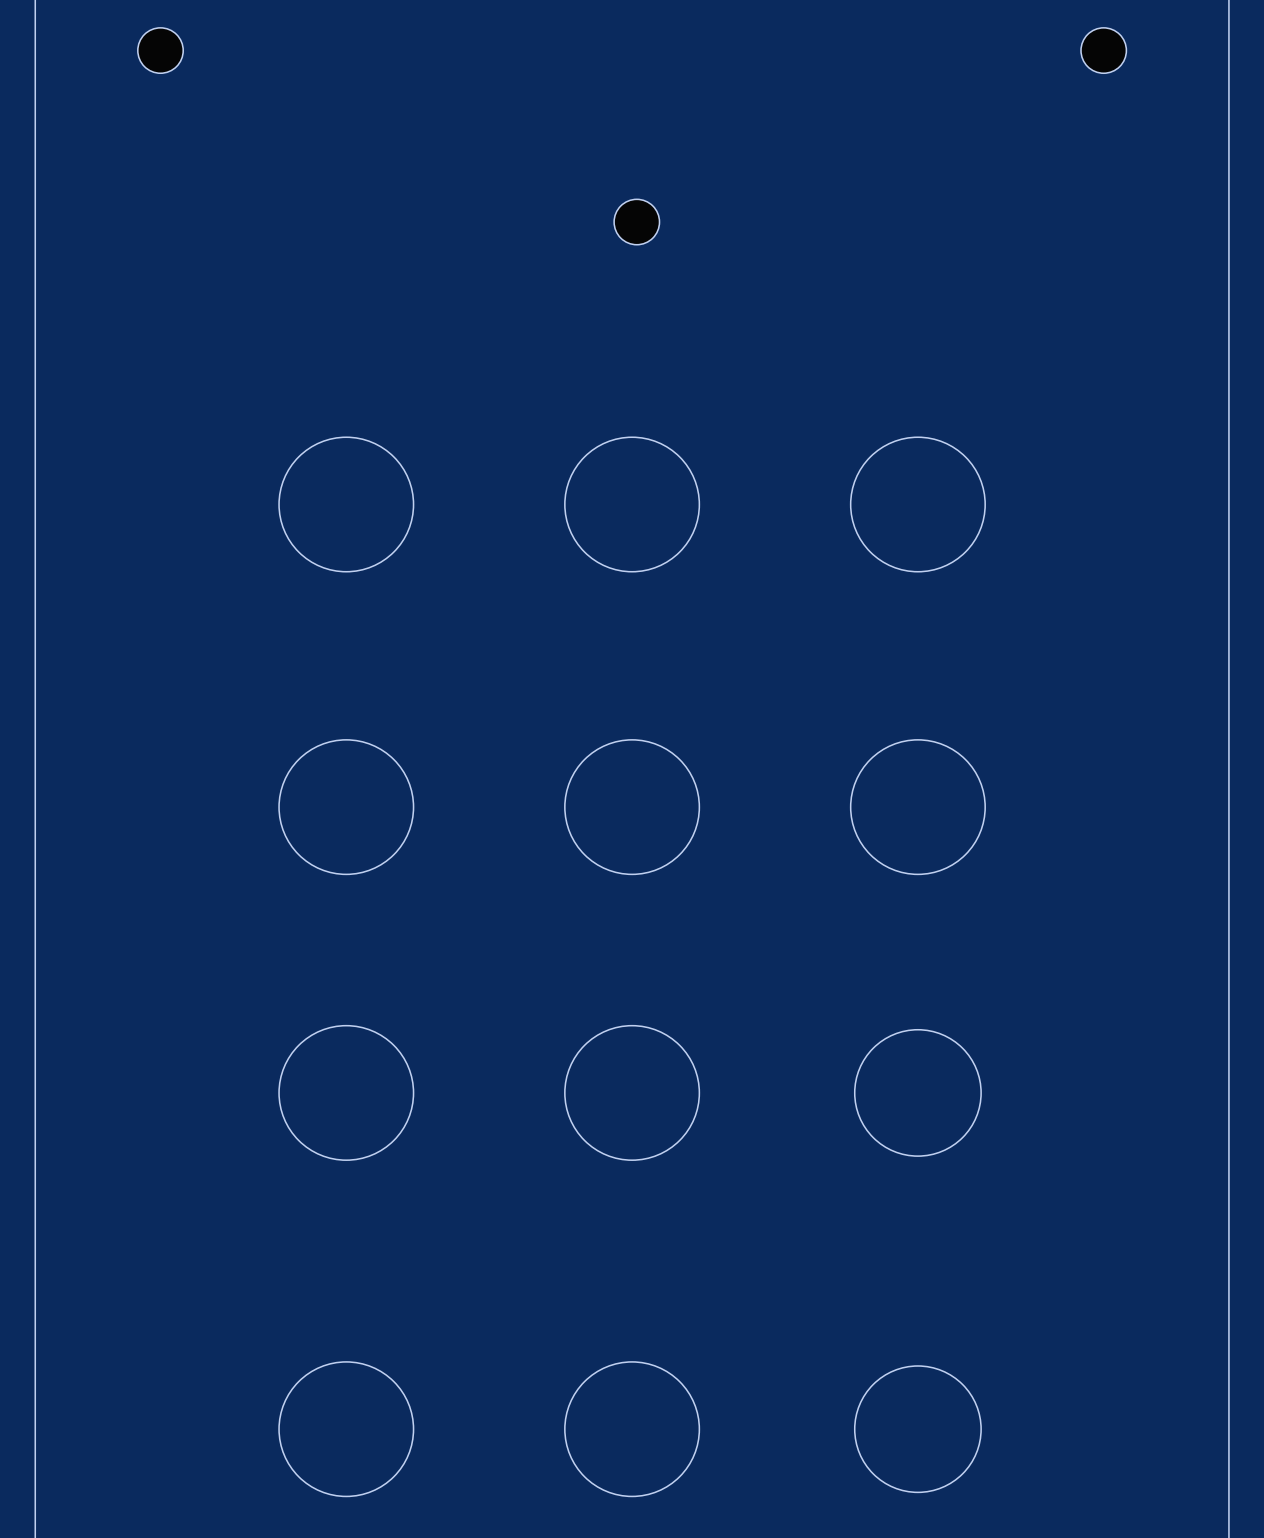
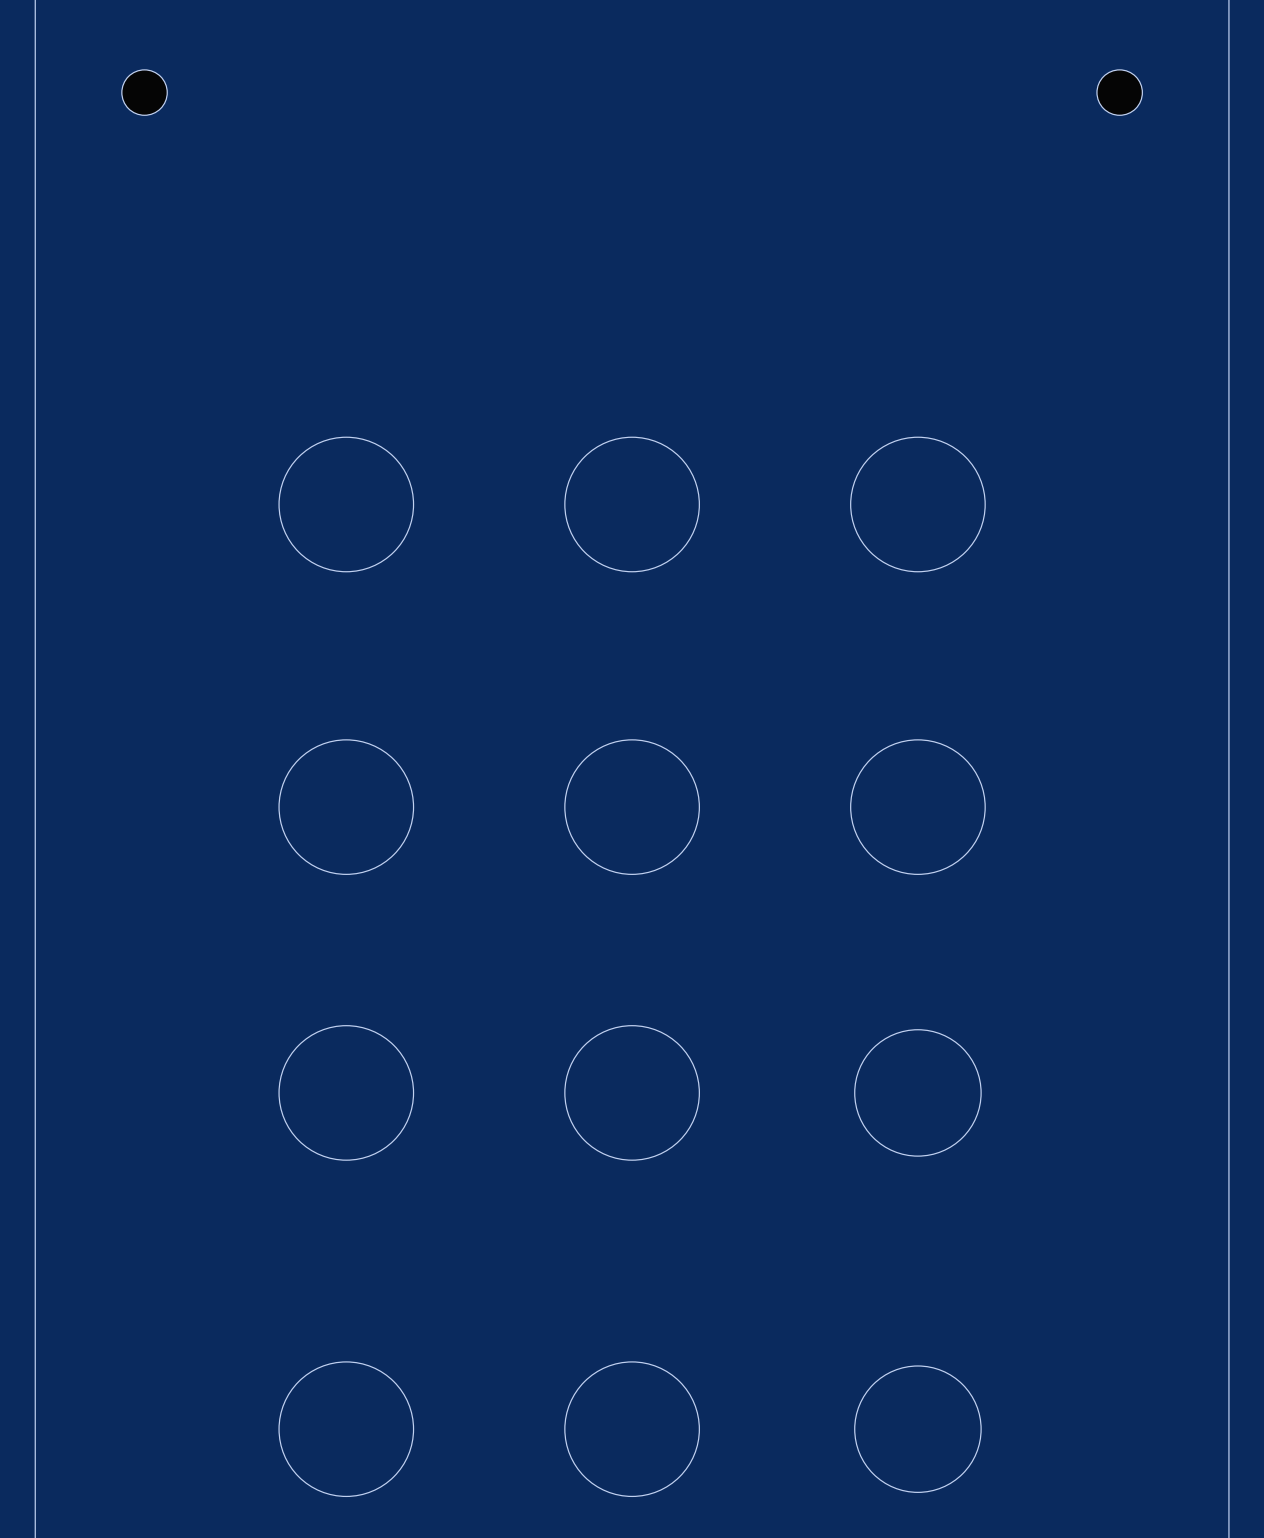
part position: (160, 50) -> (144, 92)
part position: (1103, 50) -> (1119, 92)
part: (636, 222) -> none

